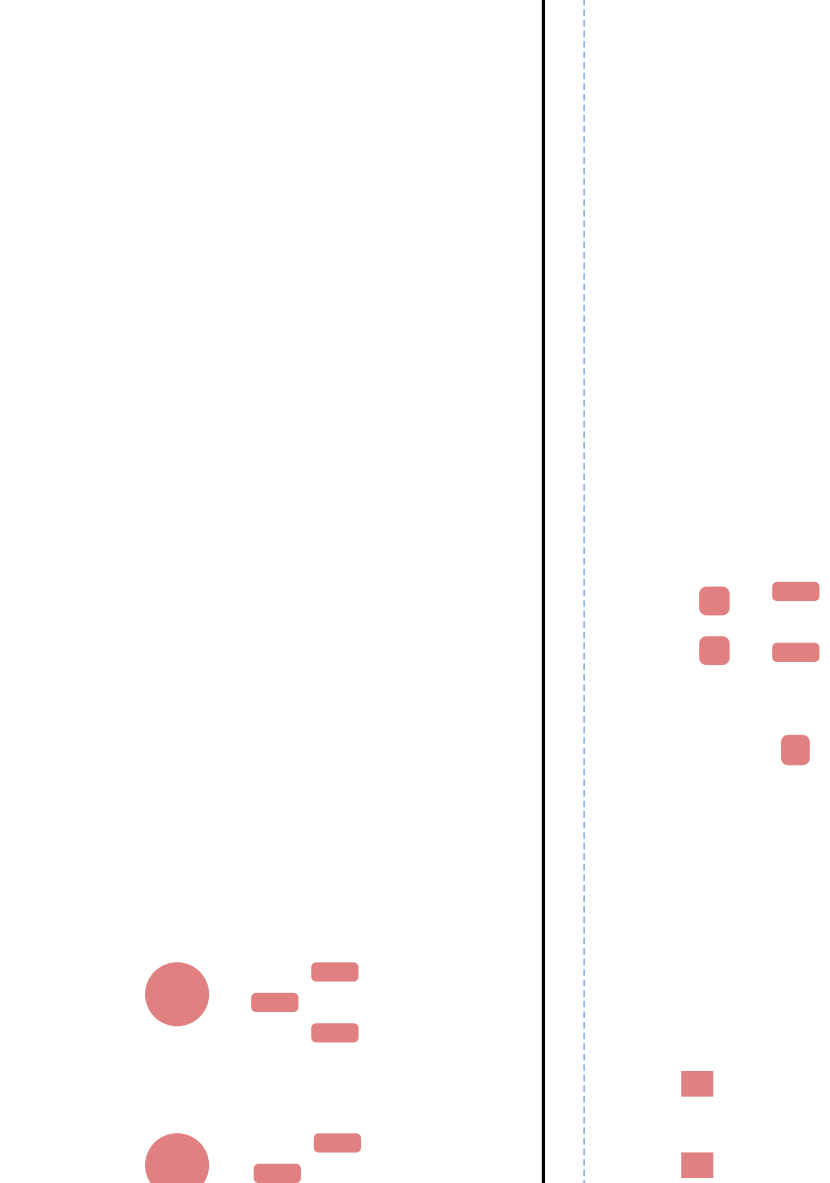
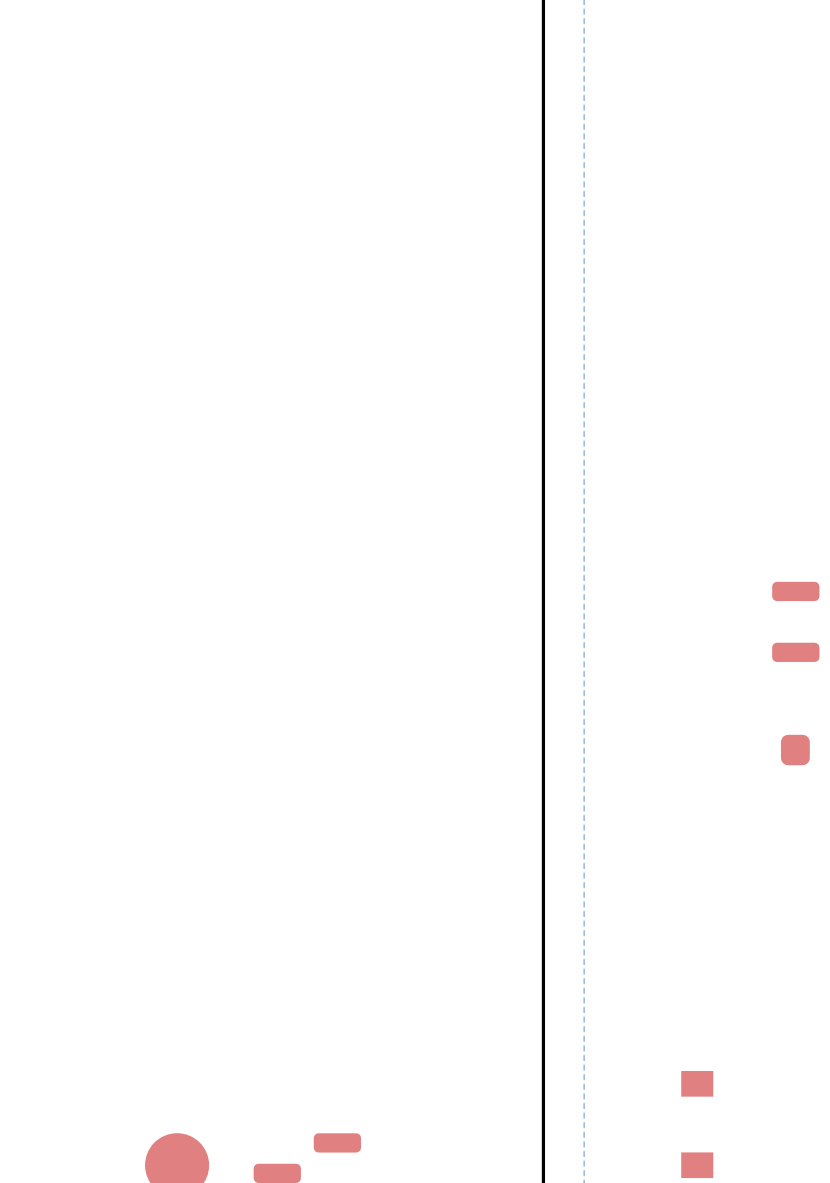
part: (714, 625) -> none
part: (177, 994) -> none
part: (304, 1002) -> none

